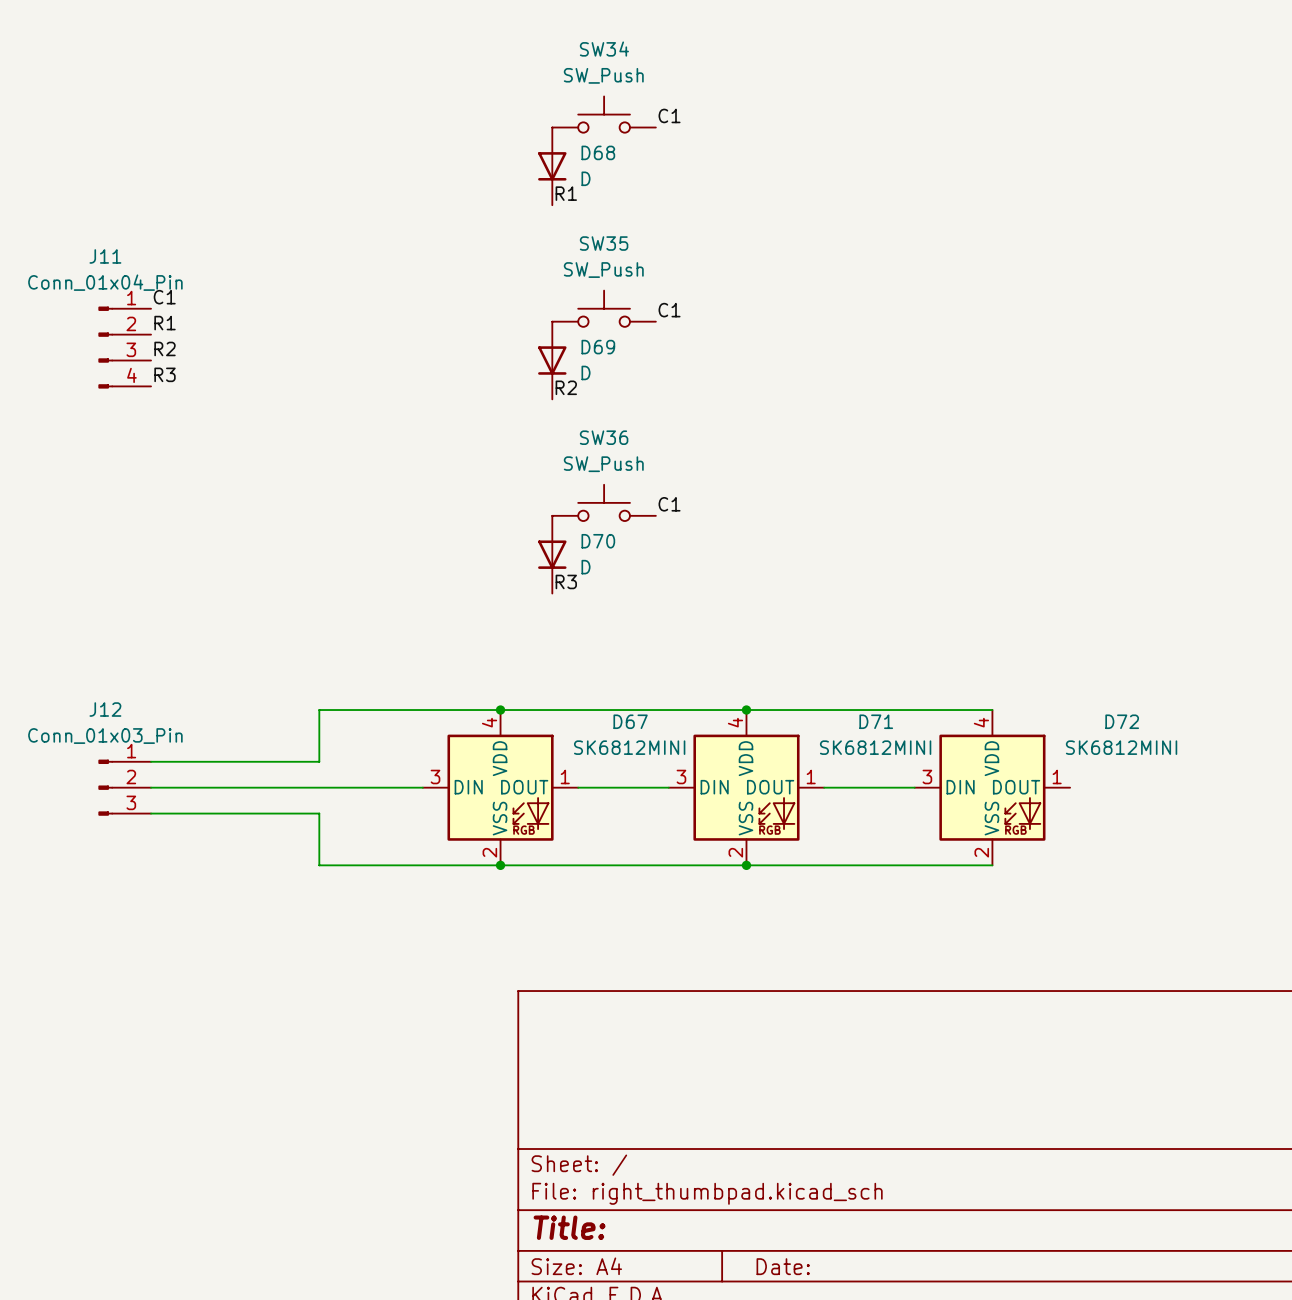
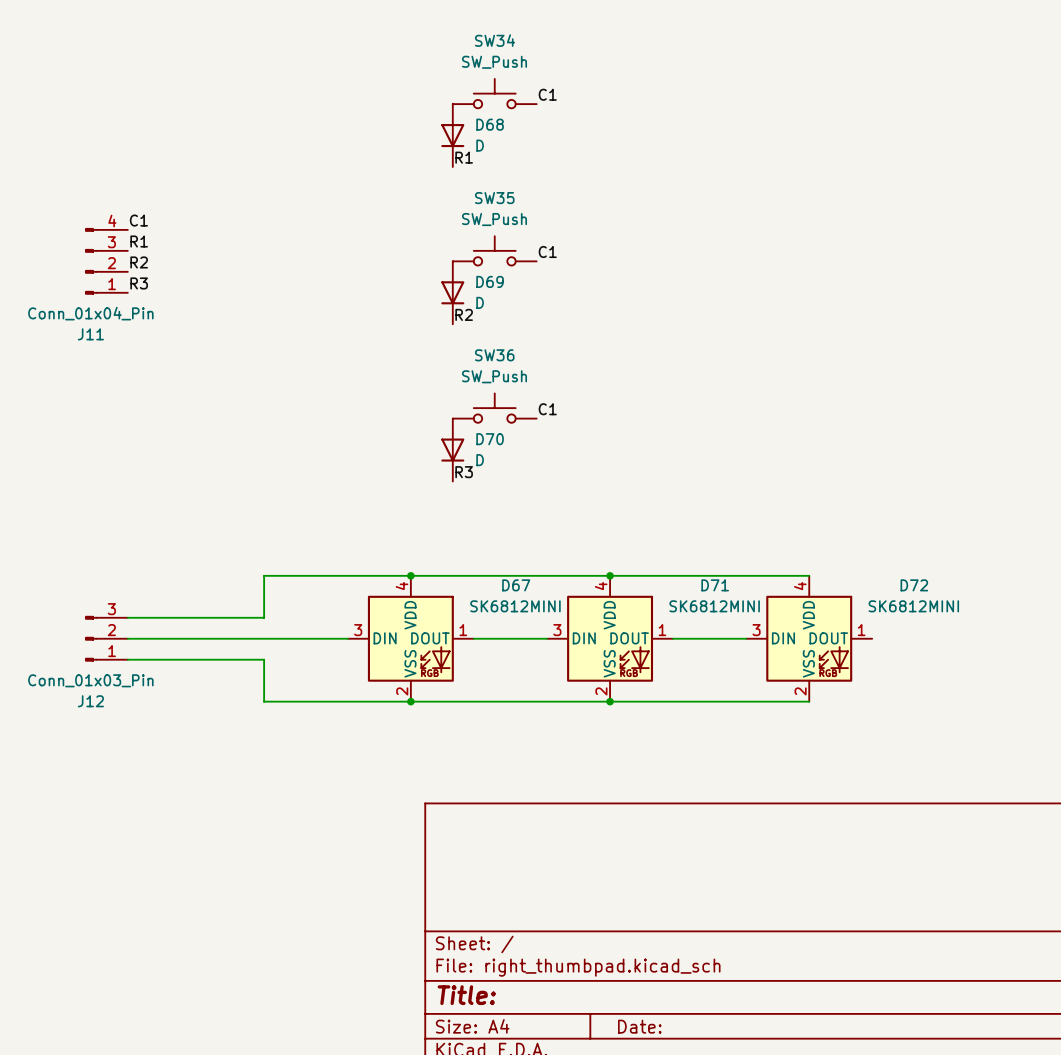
label: none -> C1 (138, 220)
label: C1 (164, 297) -> R1 (139, 241)
label: R1 (165, 323) -> R2 (139, 262)
J11 flip: as is (105, 347) -> up-down (91, 261)
label: R2 (165, 348) -> R3 (139, 283)
label: R3 (165, 374) -> none
J12 flip: as is (105, 787) -> up-down (91, 638)

